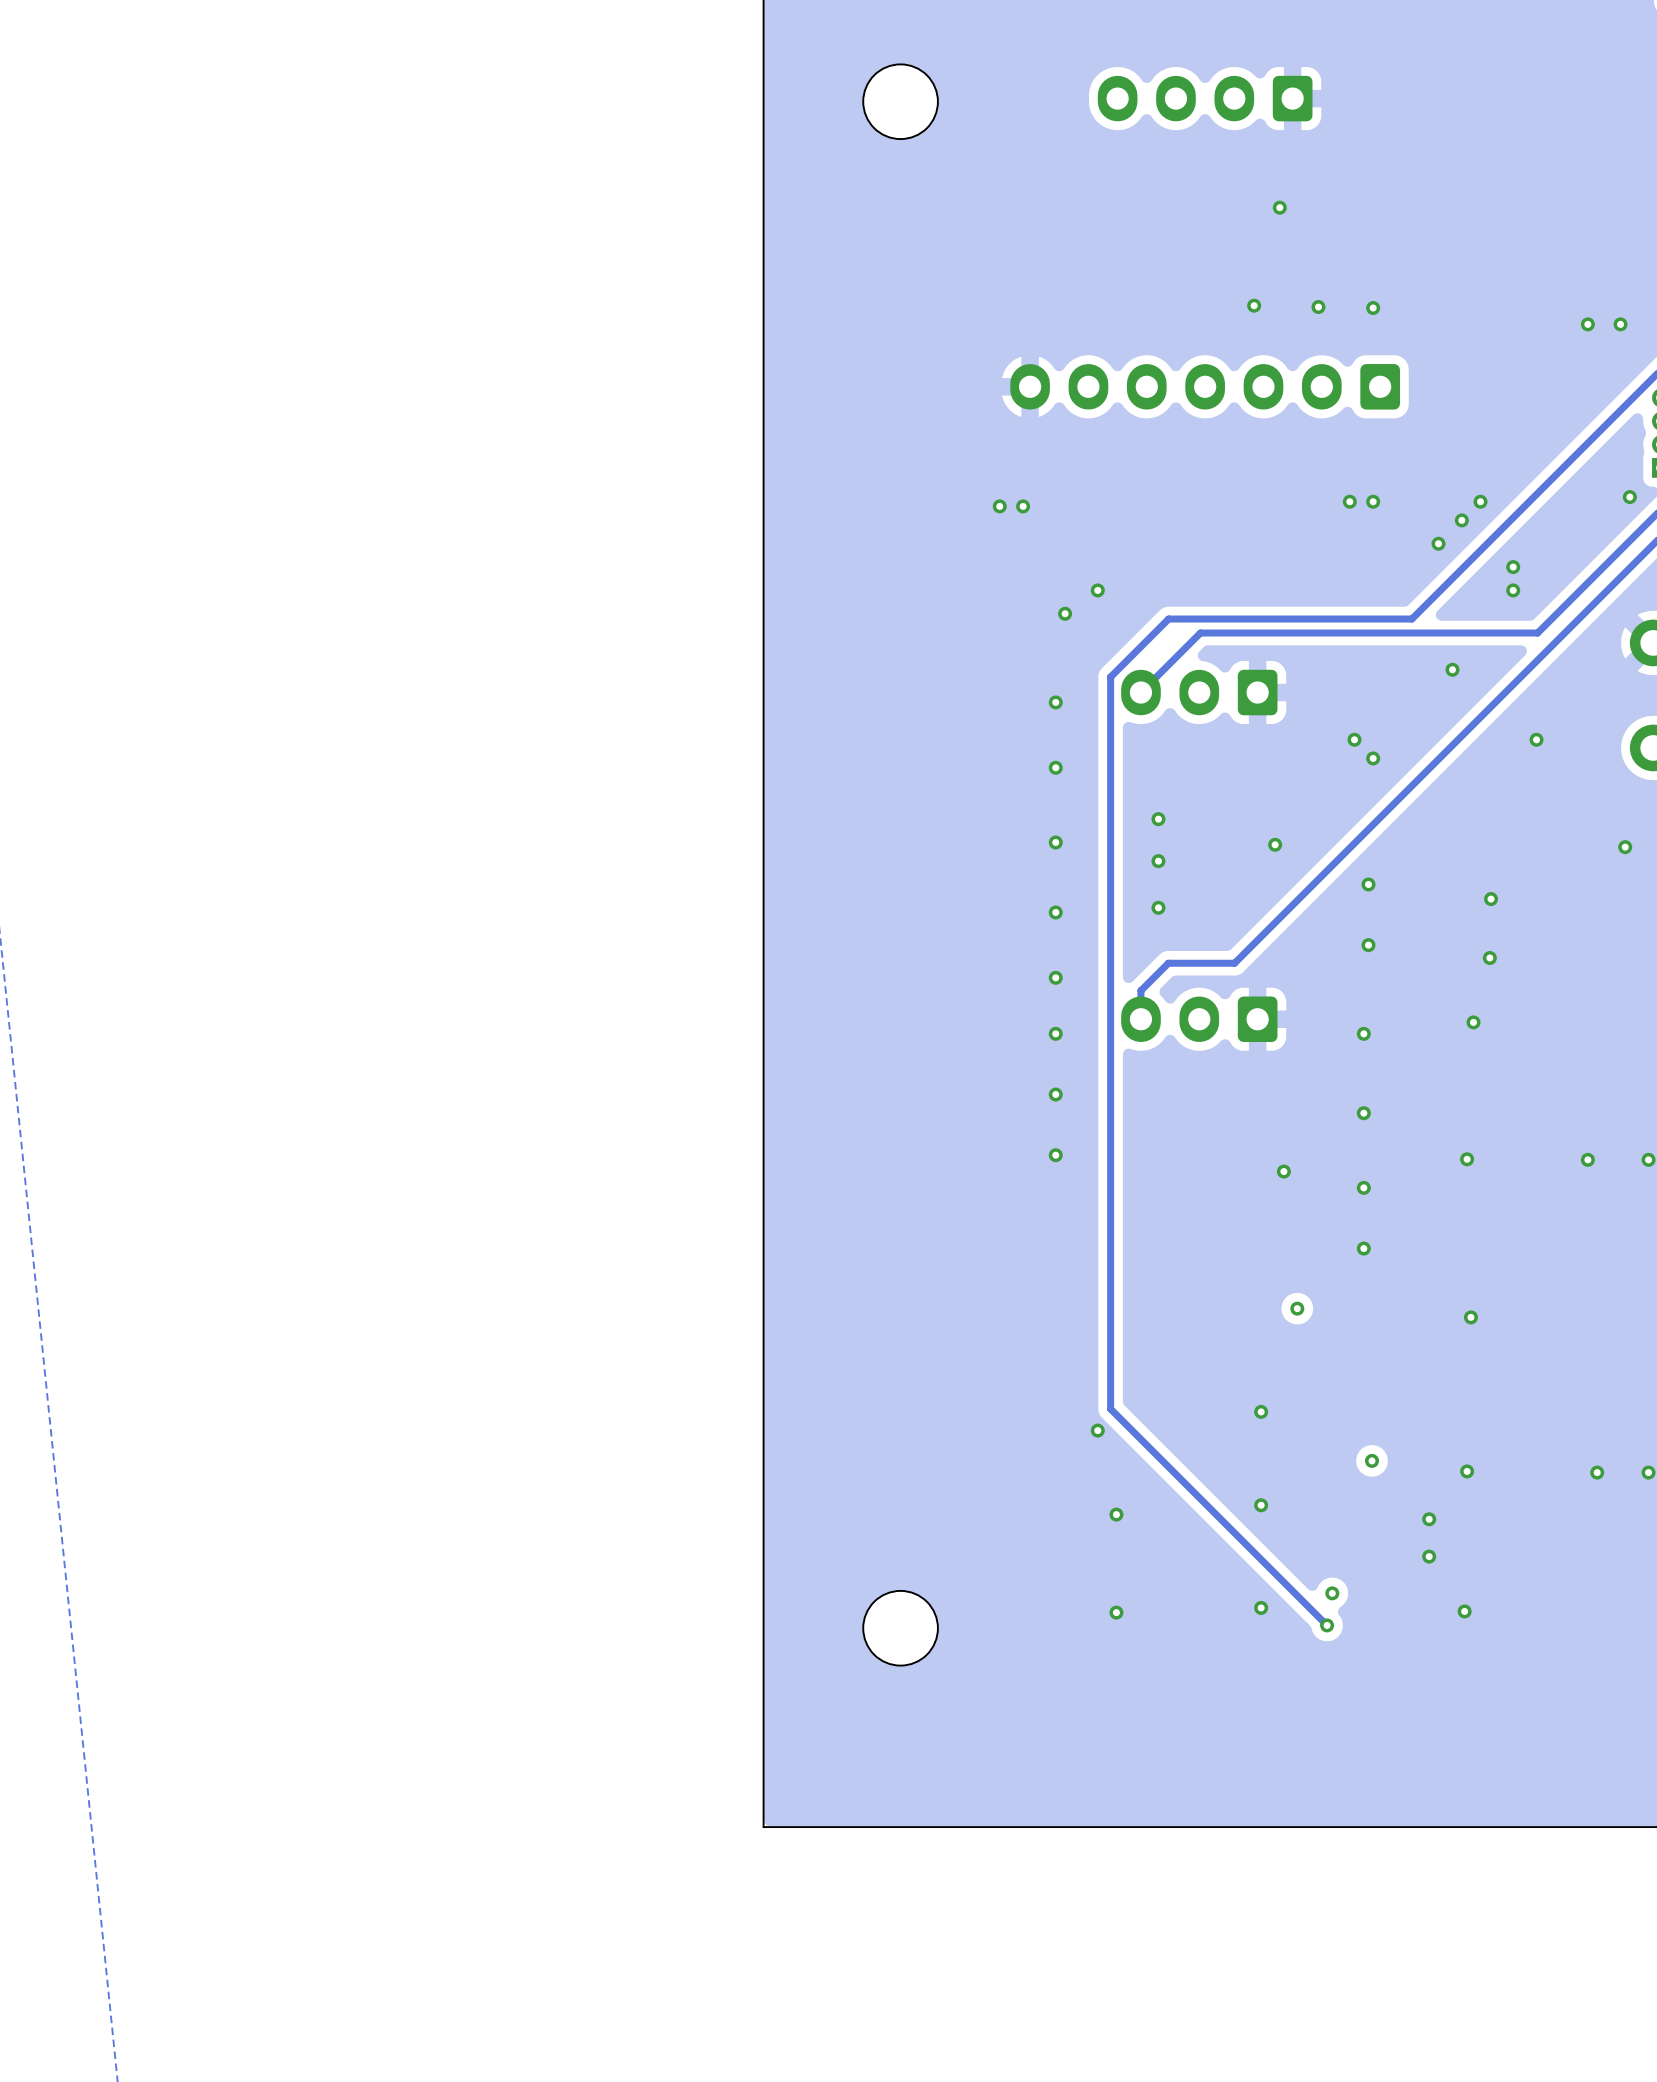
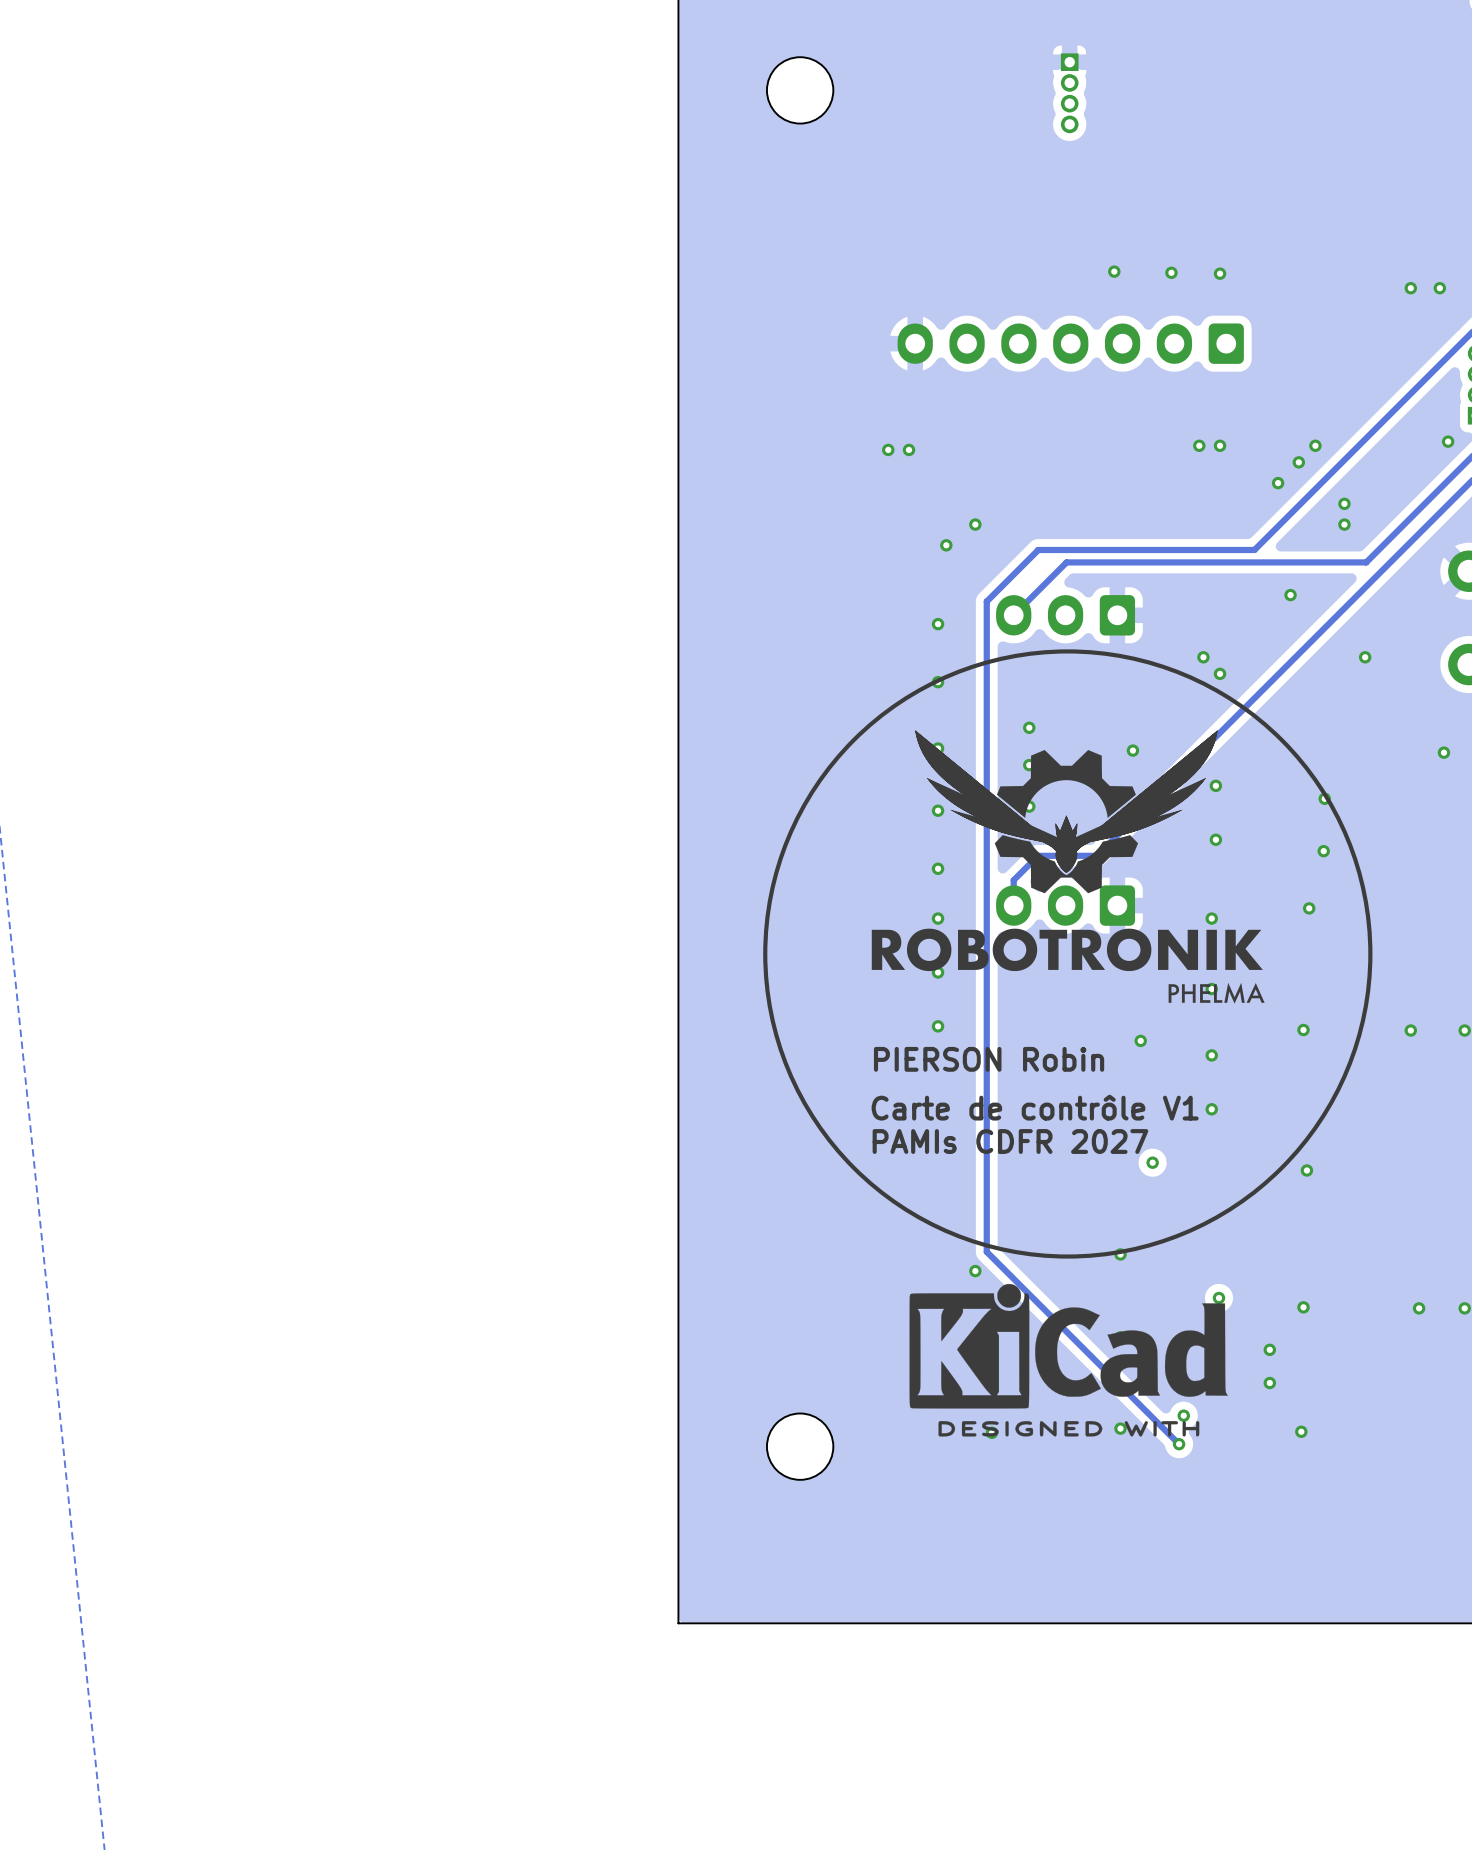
part footprint: [1097, 75, 1313, 122] -> [1060, 53, 1079, 134]
via: (1279, 207) -> none
drawing: none -> [763, 649, 1373, 1259]
text: none -> PIERSON Robin (989, 1059)
text: none -> Carte de contrôle V1 (1035, 1107)
text: none -> PAMIs CDFR 2027 (1010, 1141)
drawing: none -> [909, 1283, 1228, 1437]

